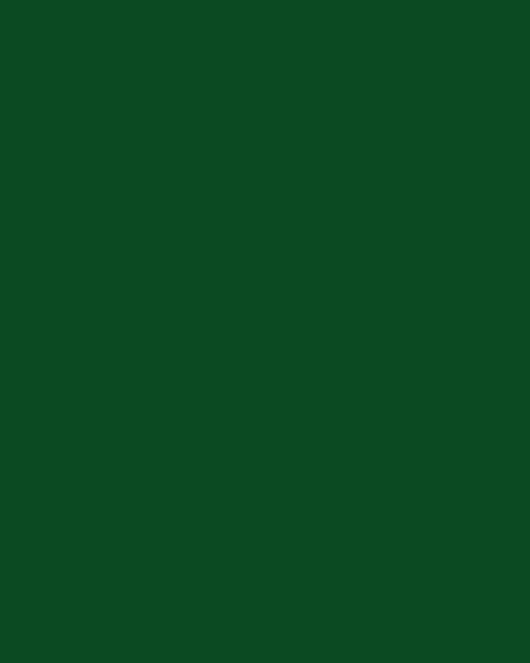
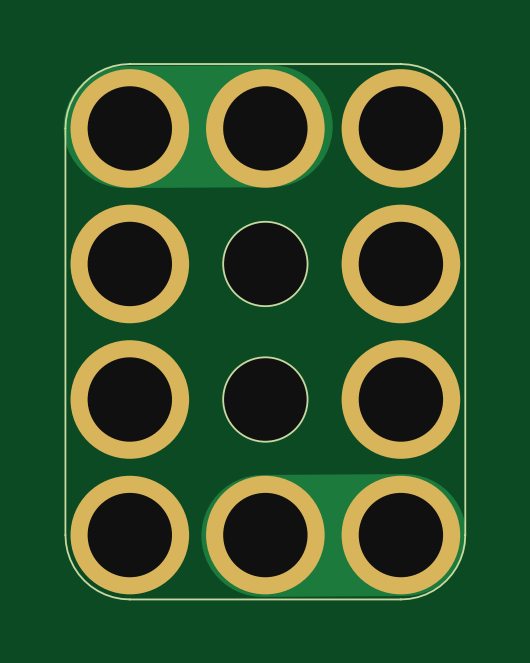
part: none -> (264, 331)

